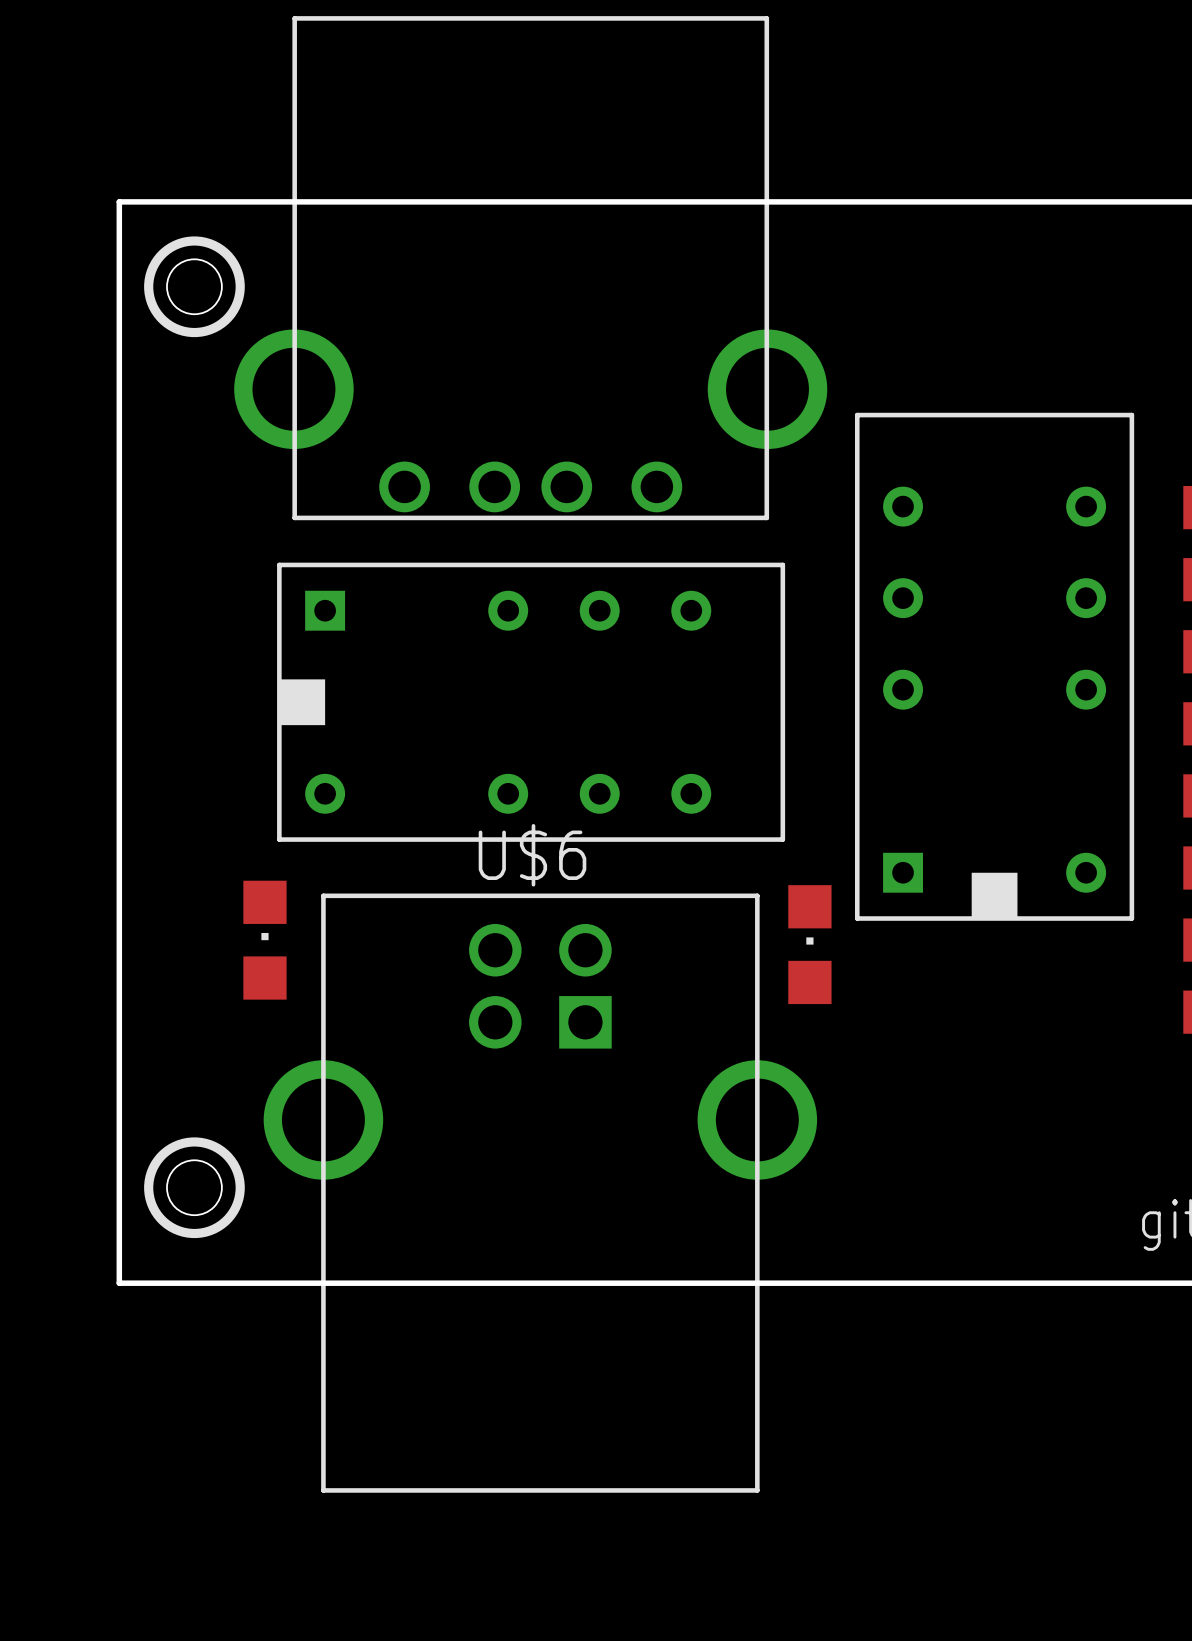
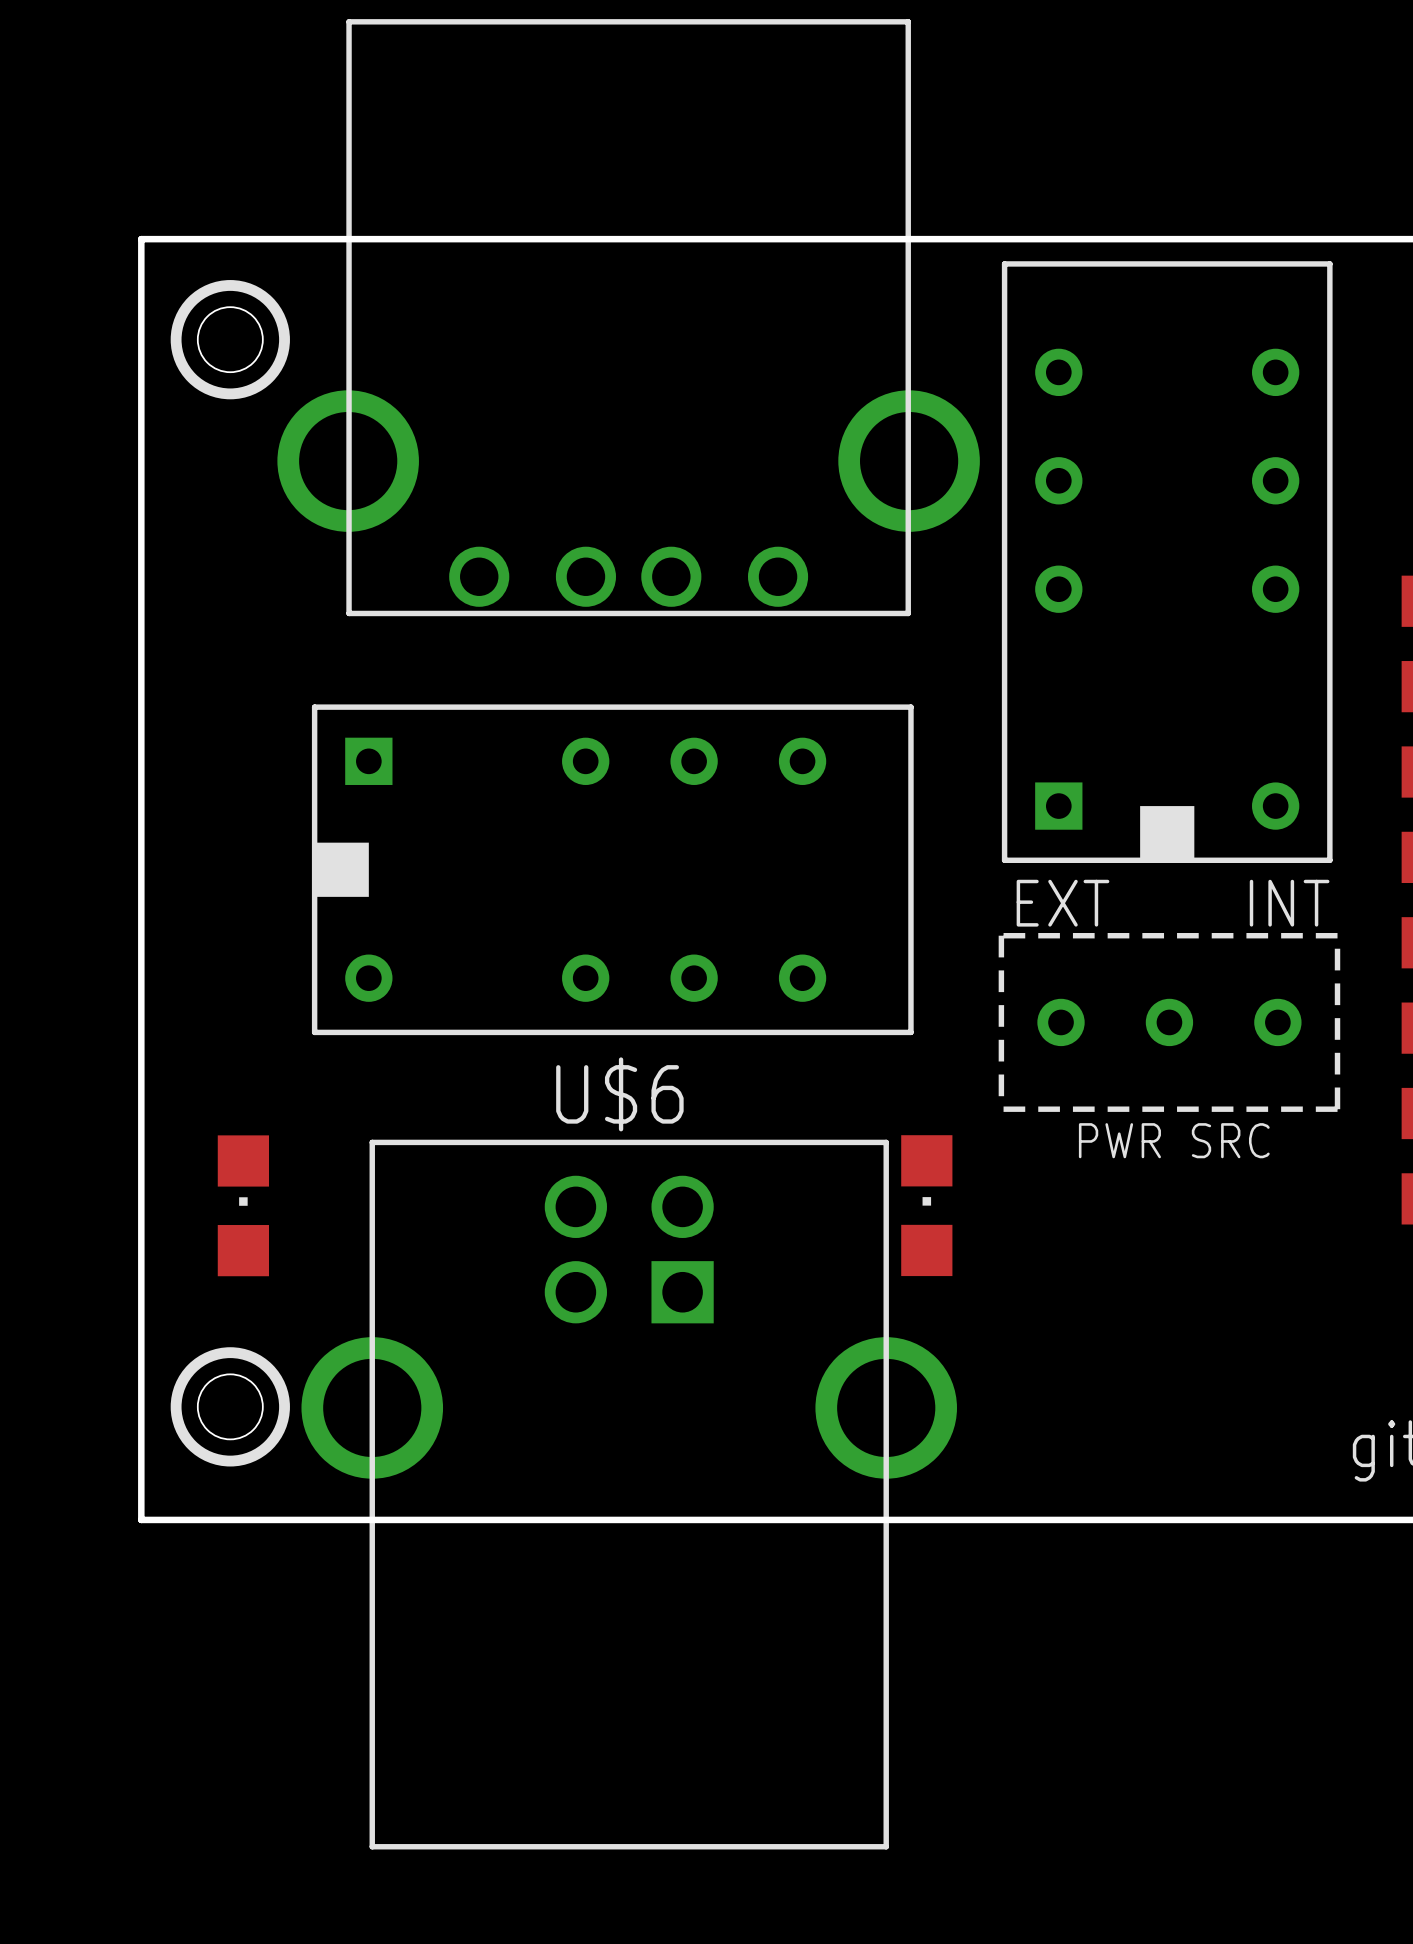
part position: (994, 666) -> (1167, 562)
part position: (531, 702) -> (612, 869)
text: none -> EXT (1062, 903)
text: none -> INT (1289, 903)
part: none -> (1169, 1022)
part position: (264, 940) -> (243, 1205)
part position: (809, 944) -> (926, 1205)
text: none -> PWR SRC (1174, 1140)
U$6 position: (540, 1193) -> (629, 1494)

